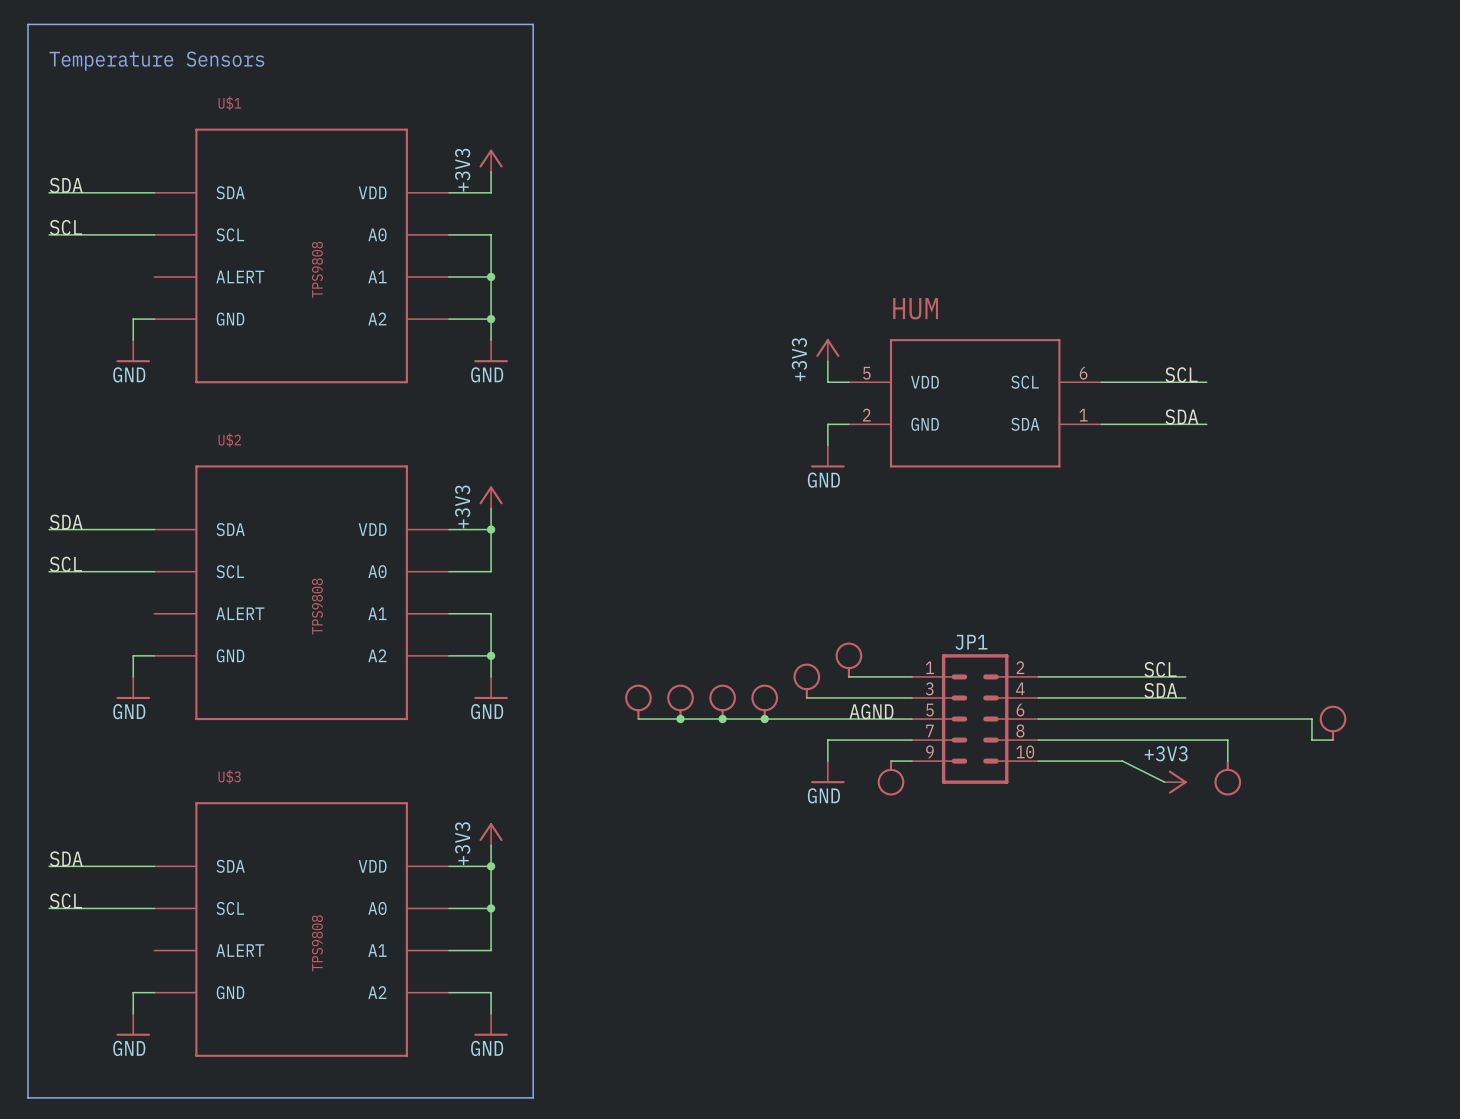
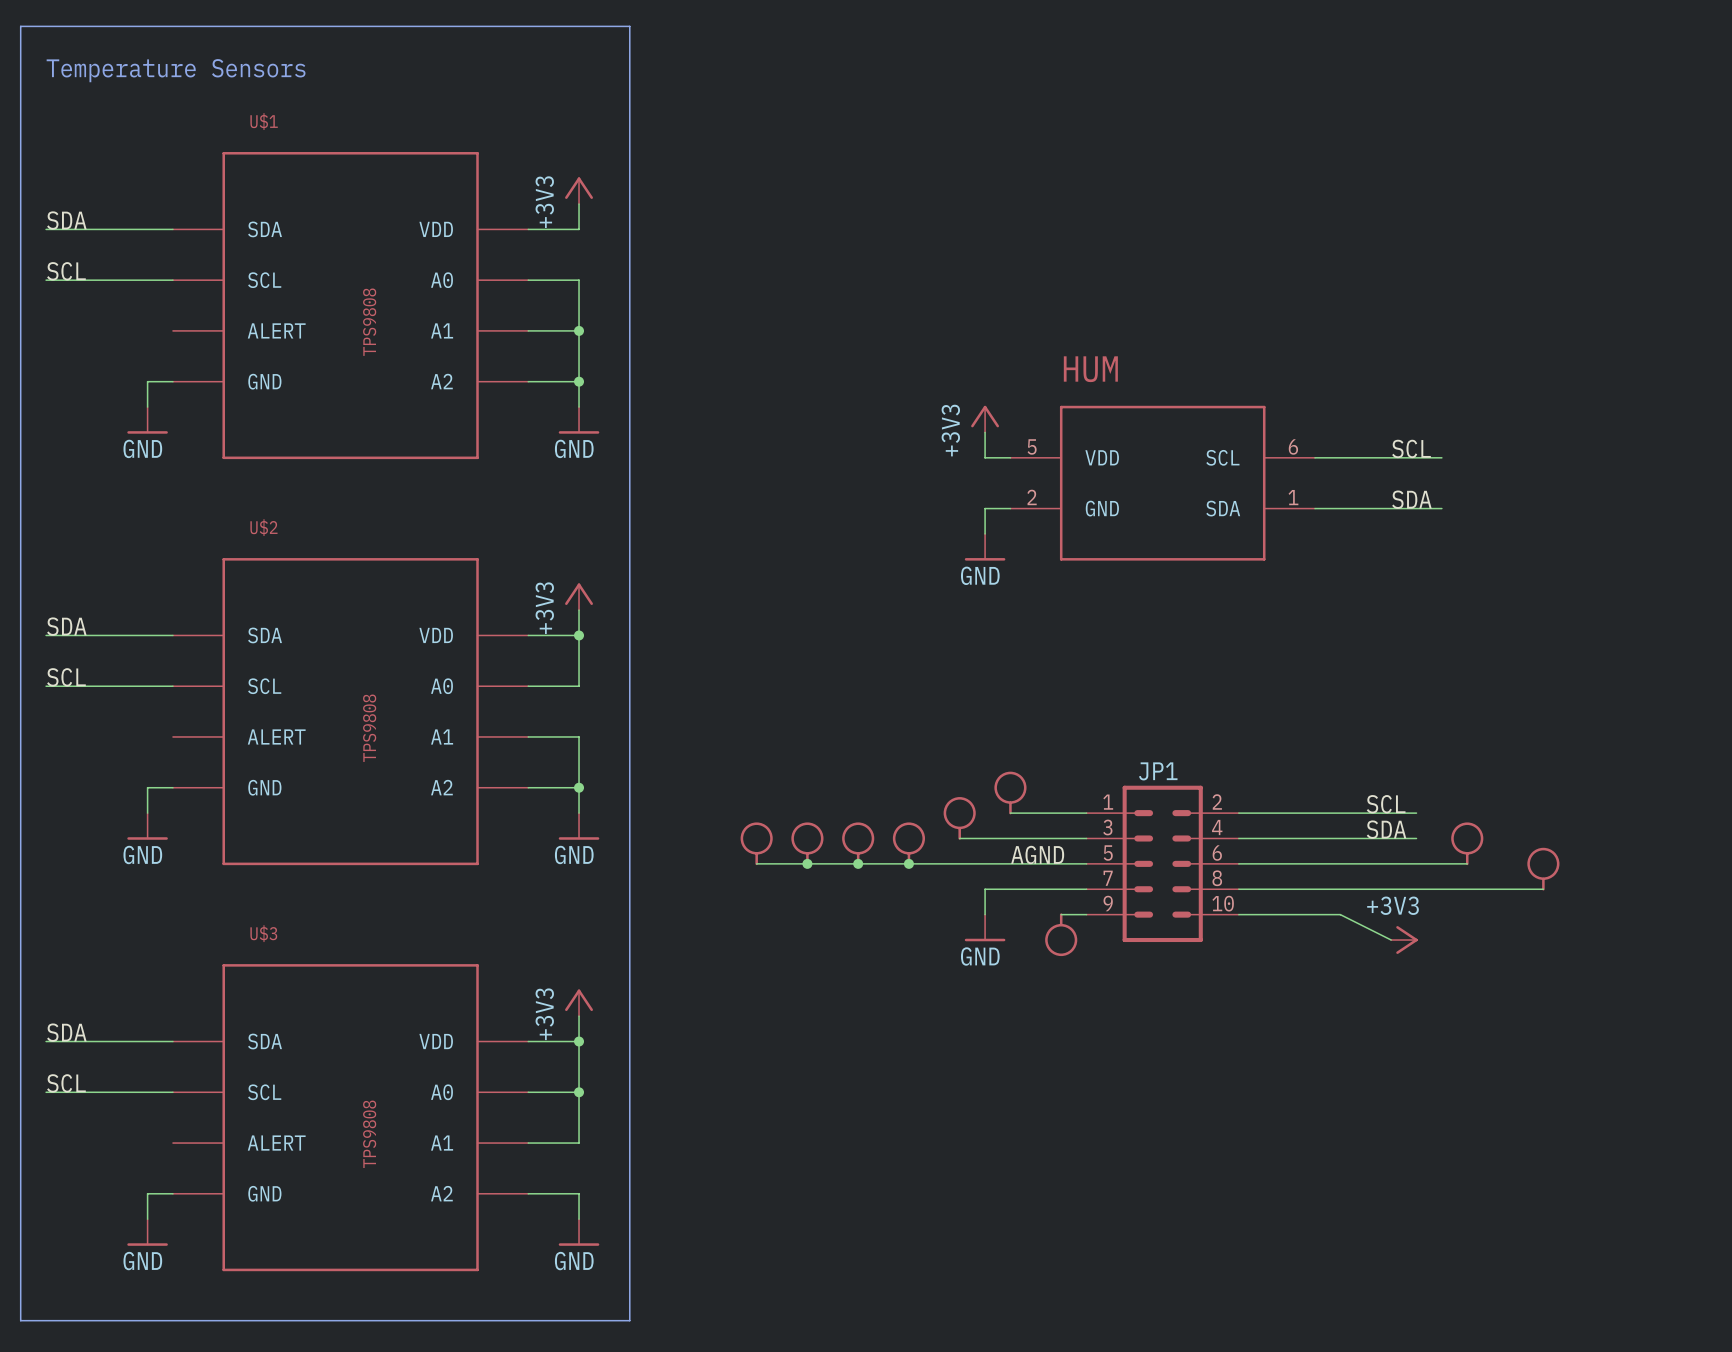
part: none -> (1467, 843)
wire: (1227, 719) (1311, 719) (1311, 740) (1333, 740) -> none
part: none -> (1543, 869)
part: (1333, 723) -> none
wire: (1227, 740) (1227, 761) -> (1467, 889) (1543, 889)
part: (1227, 777) -> none

